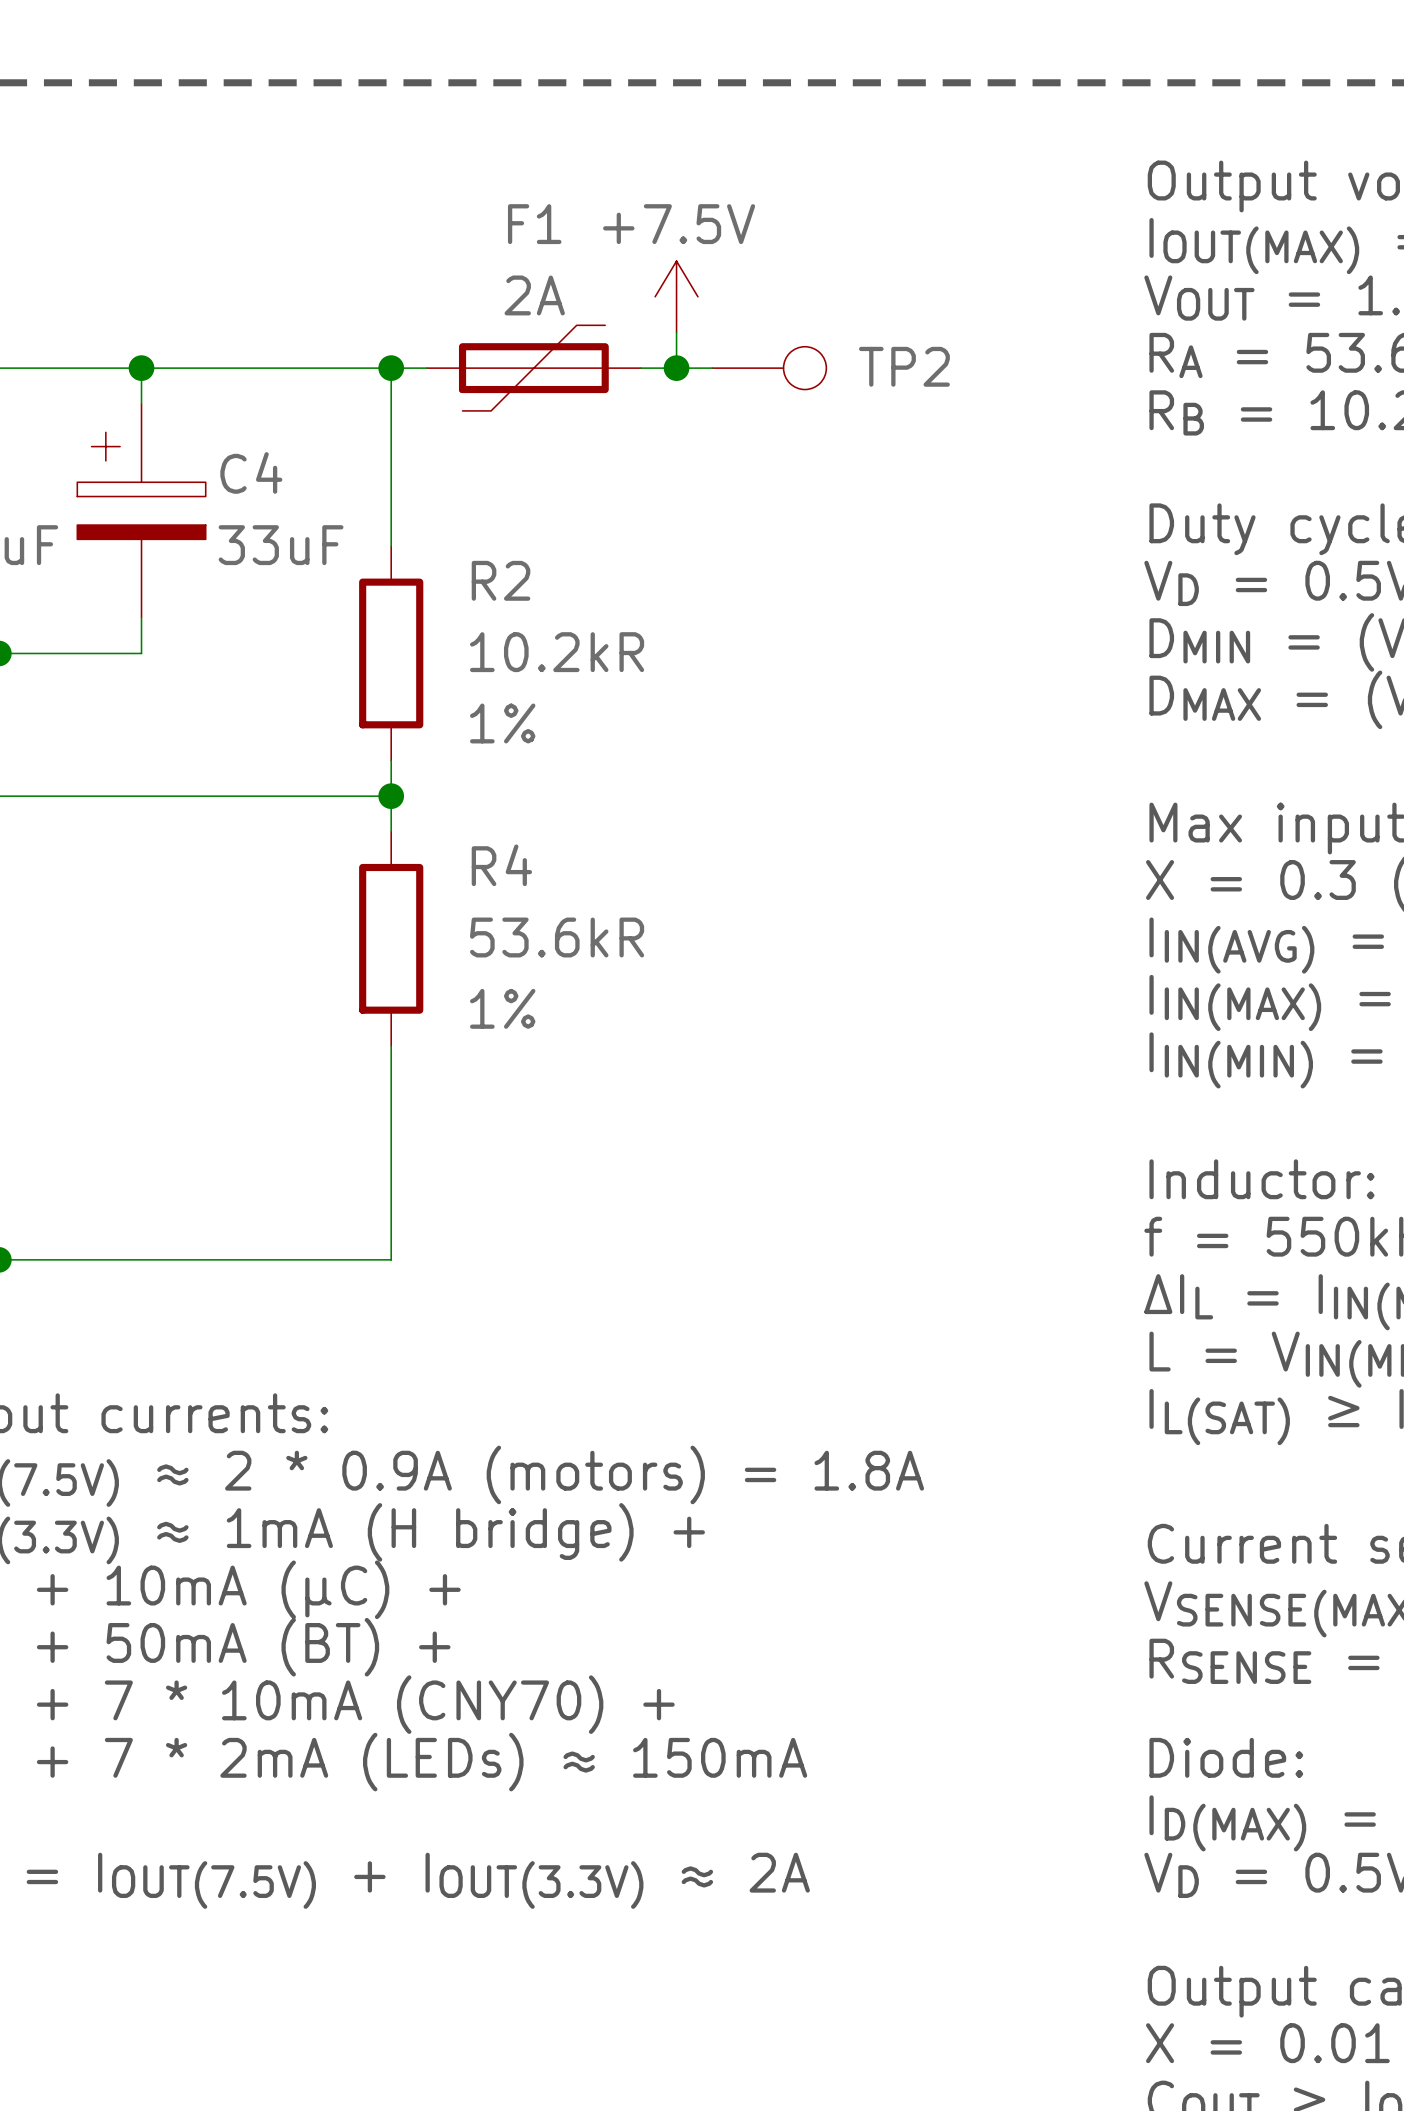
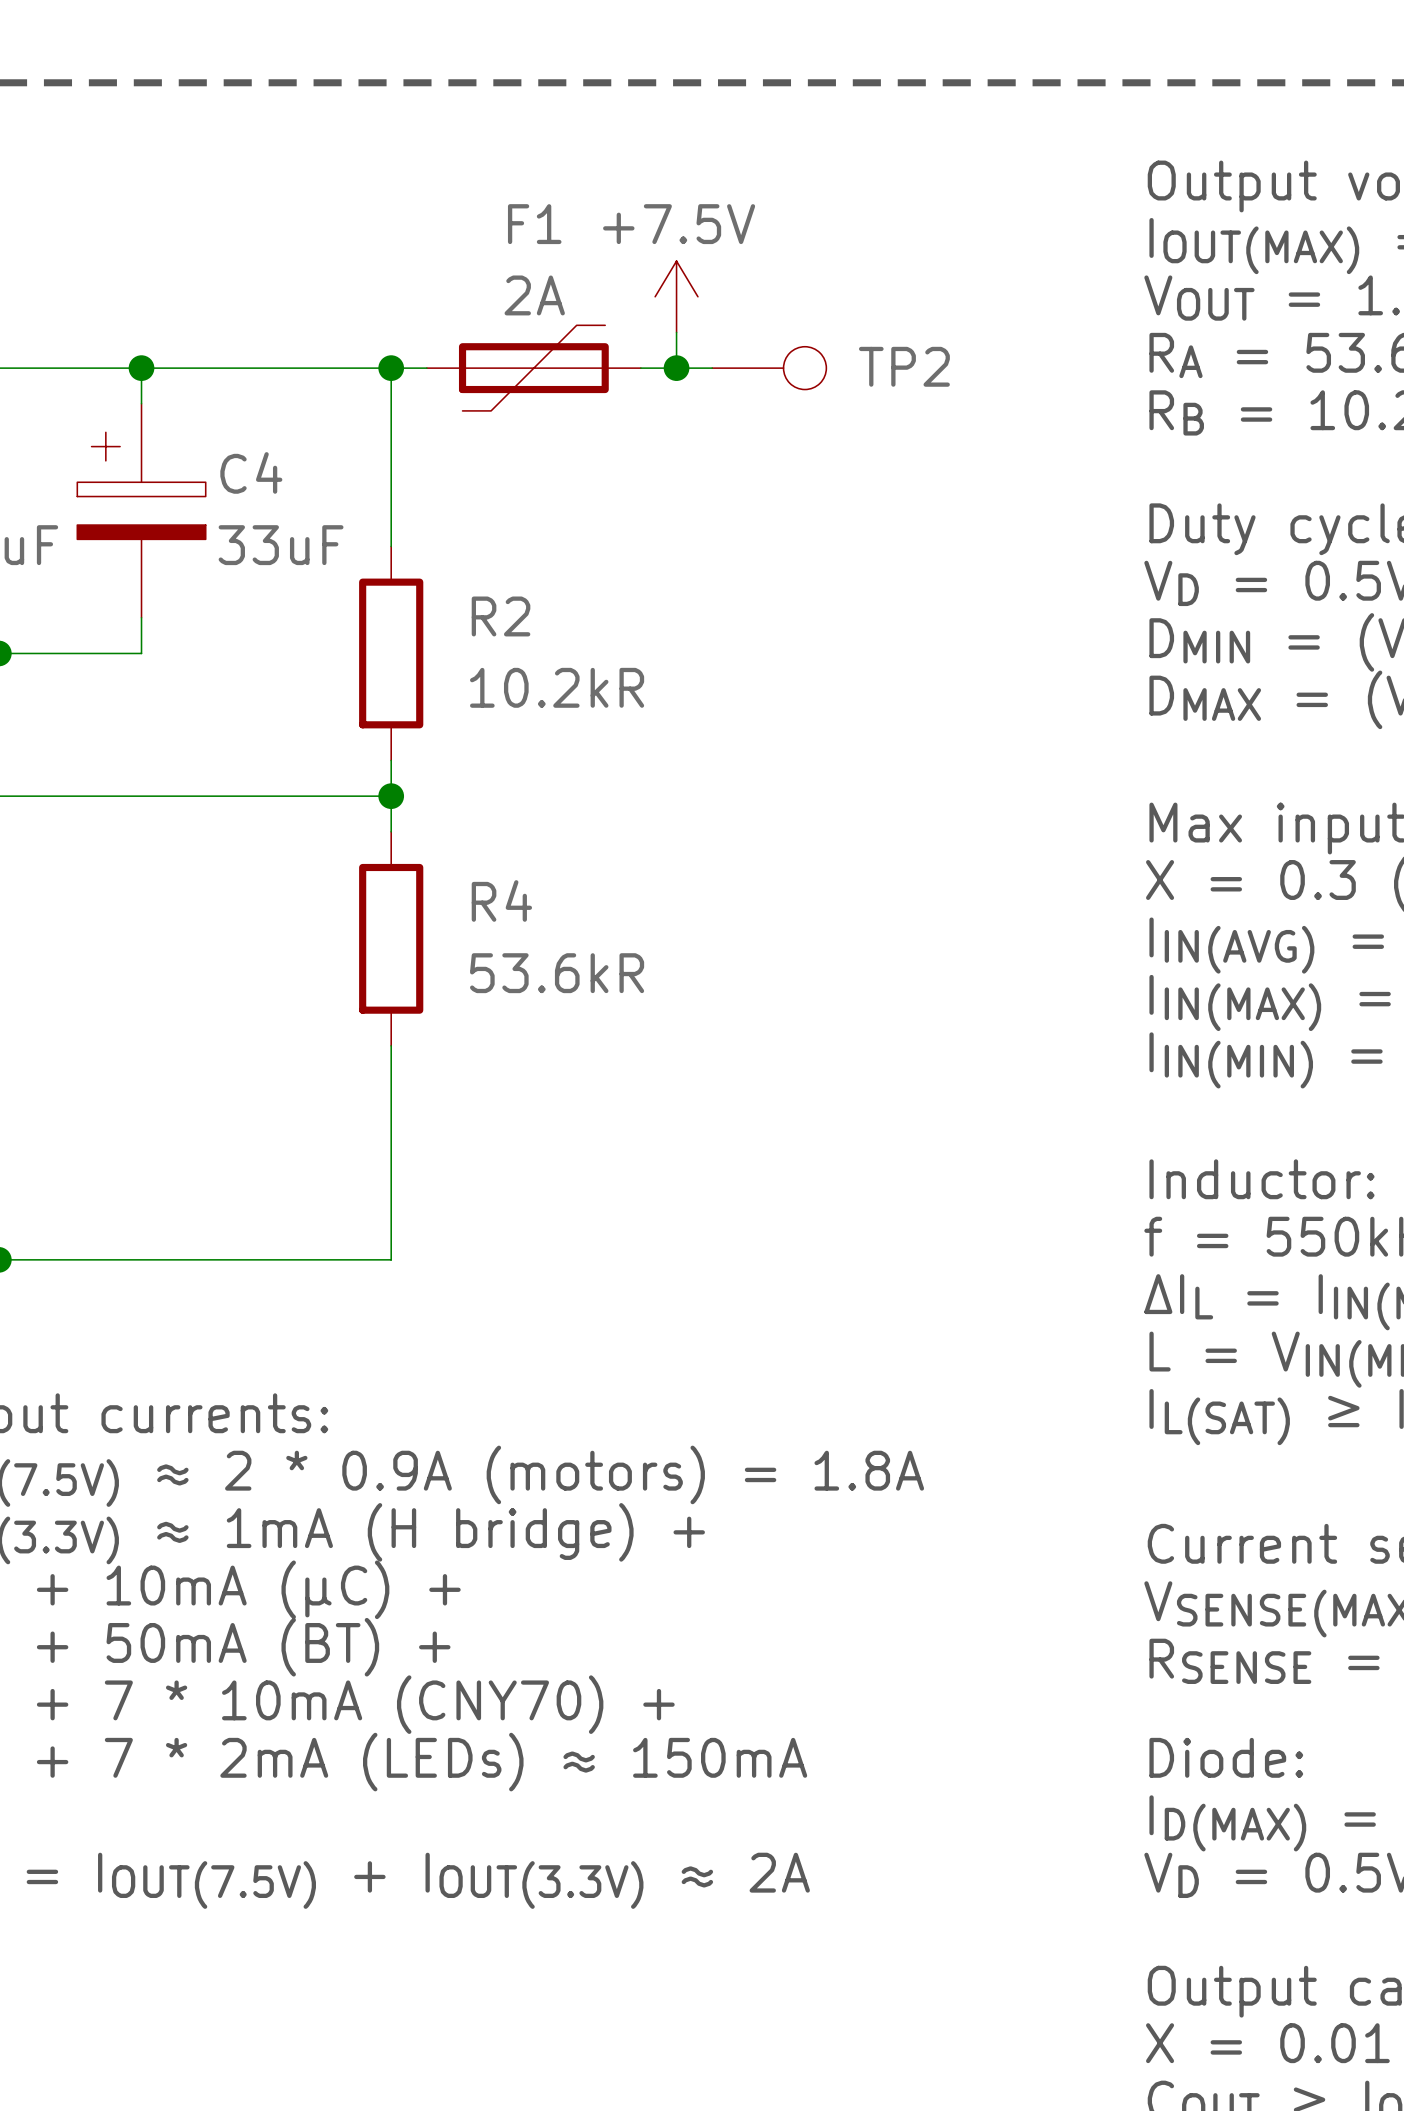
R2 name position: R2 (501, 580) -> R2 (501, 616)
R2 value position: 10.2kR (557, 652) -> 10.2kR (557, 687)
R2 text: 1% (502, 723) -> none
R4 name position: R4 (501, 865) -> R4 (501, 900)
R4 value position: 53.6kR (557, 937) -> 53.6kR (557, 973)
R4 text: 1% (502, 1008) -> none

